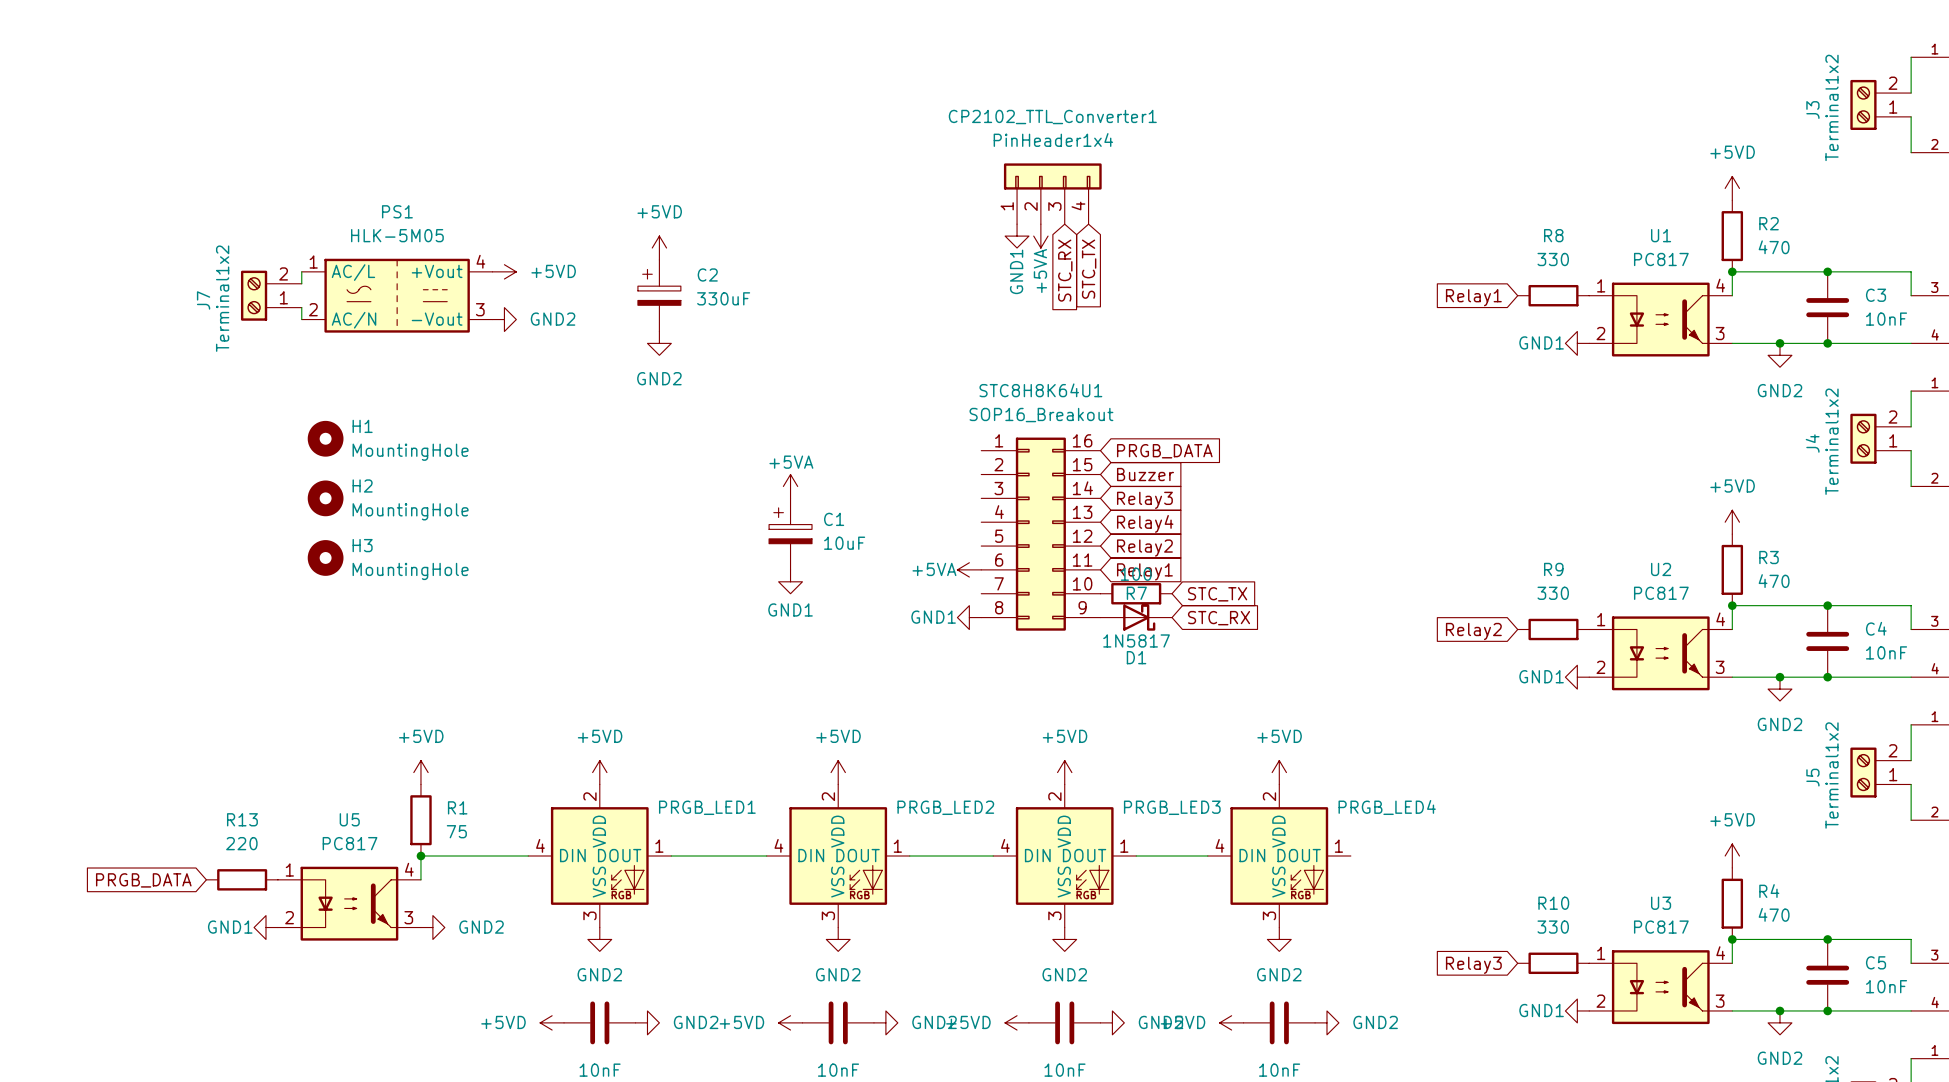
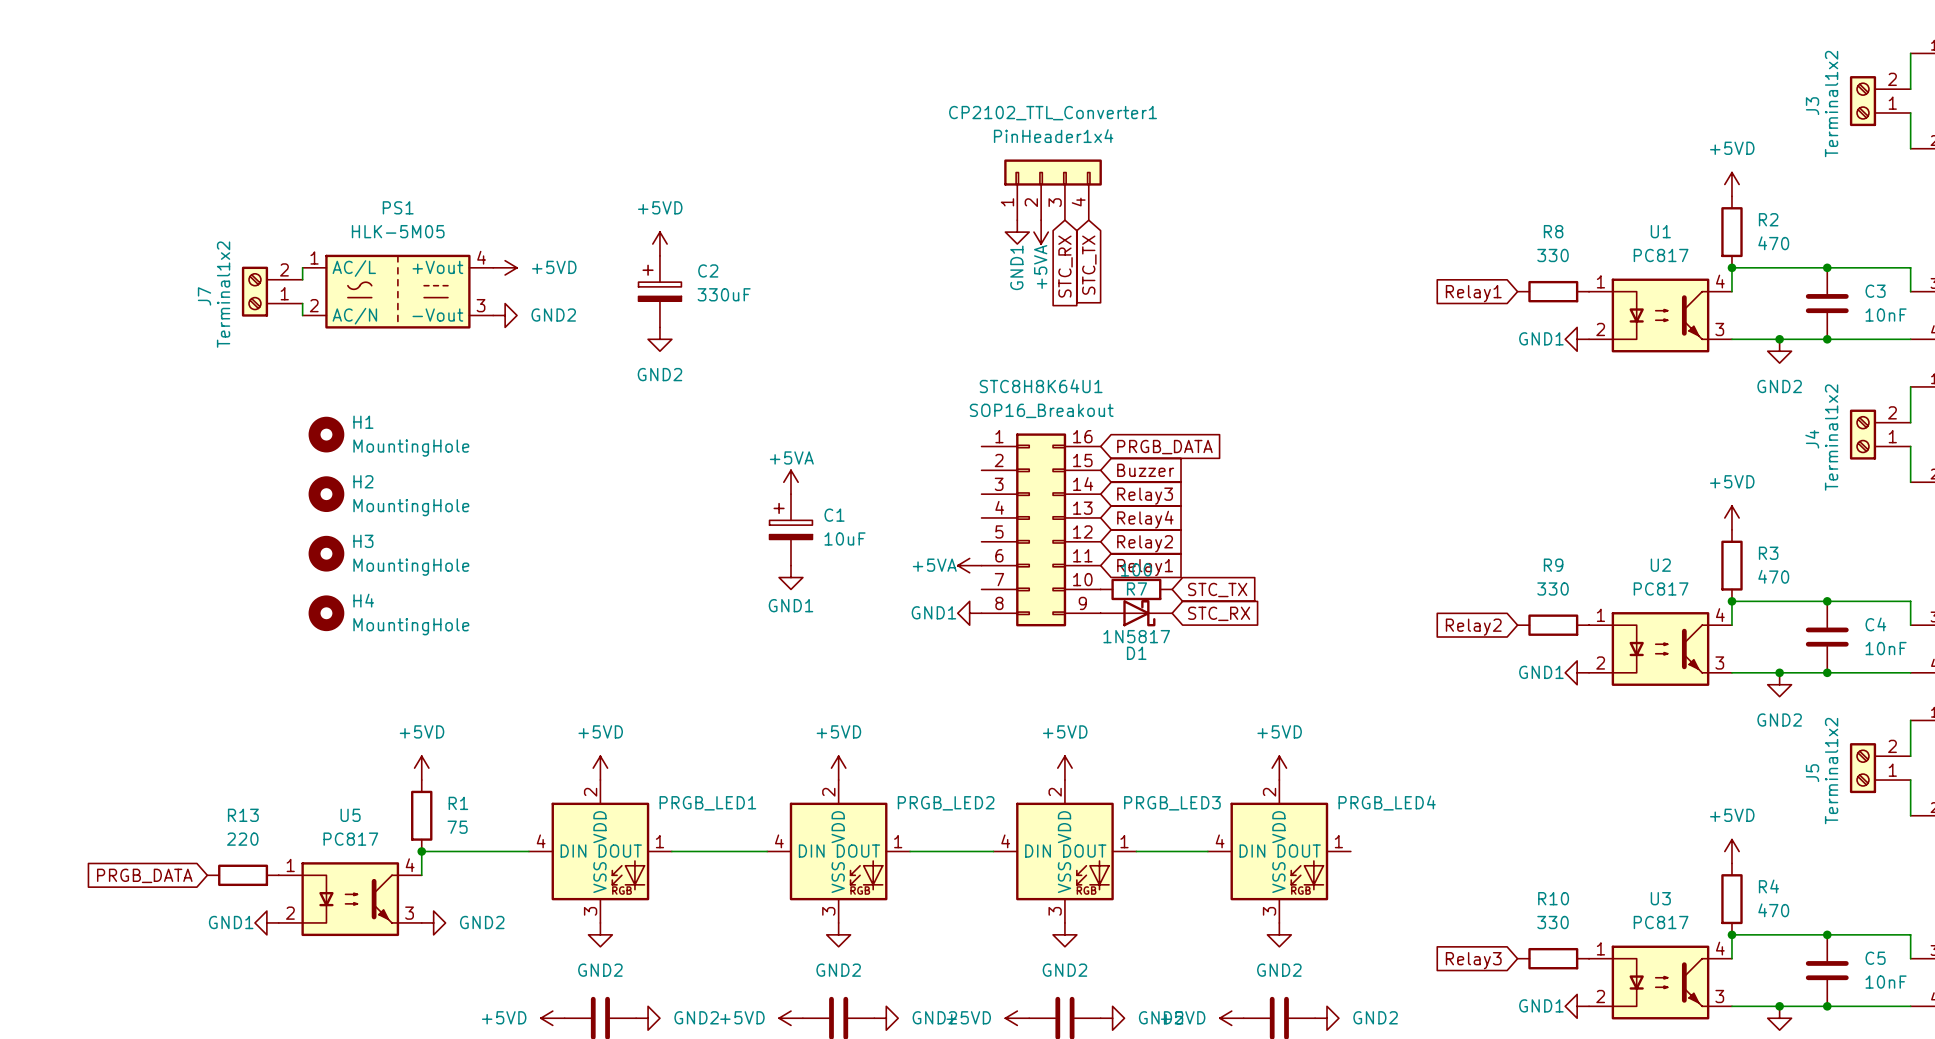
H4: none -> MountingHole (326, 613)

